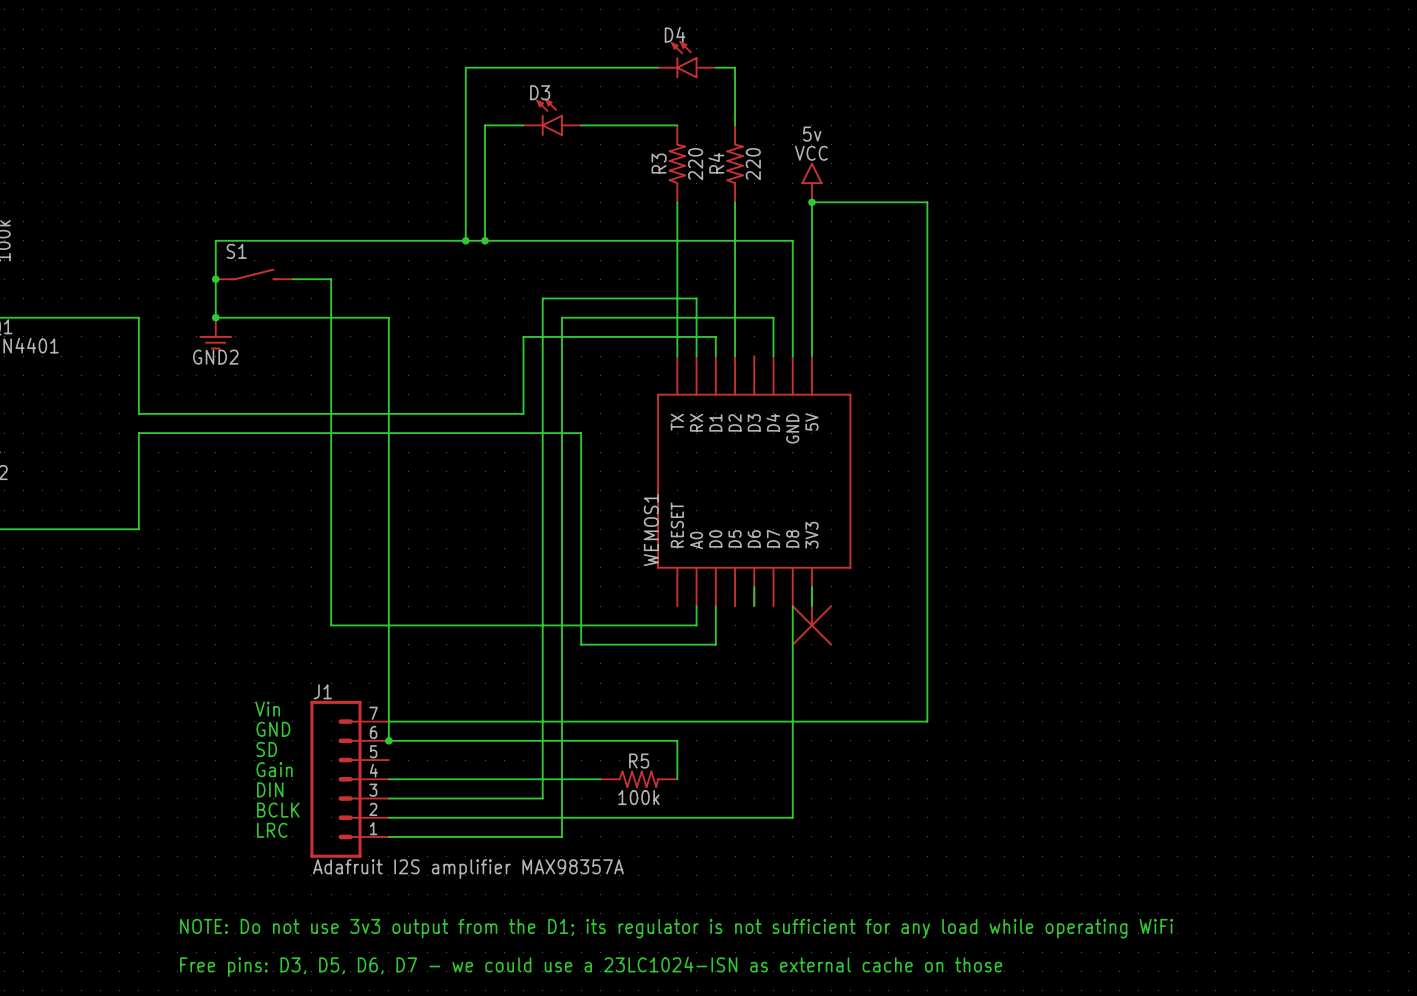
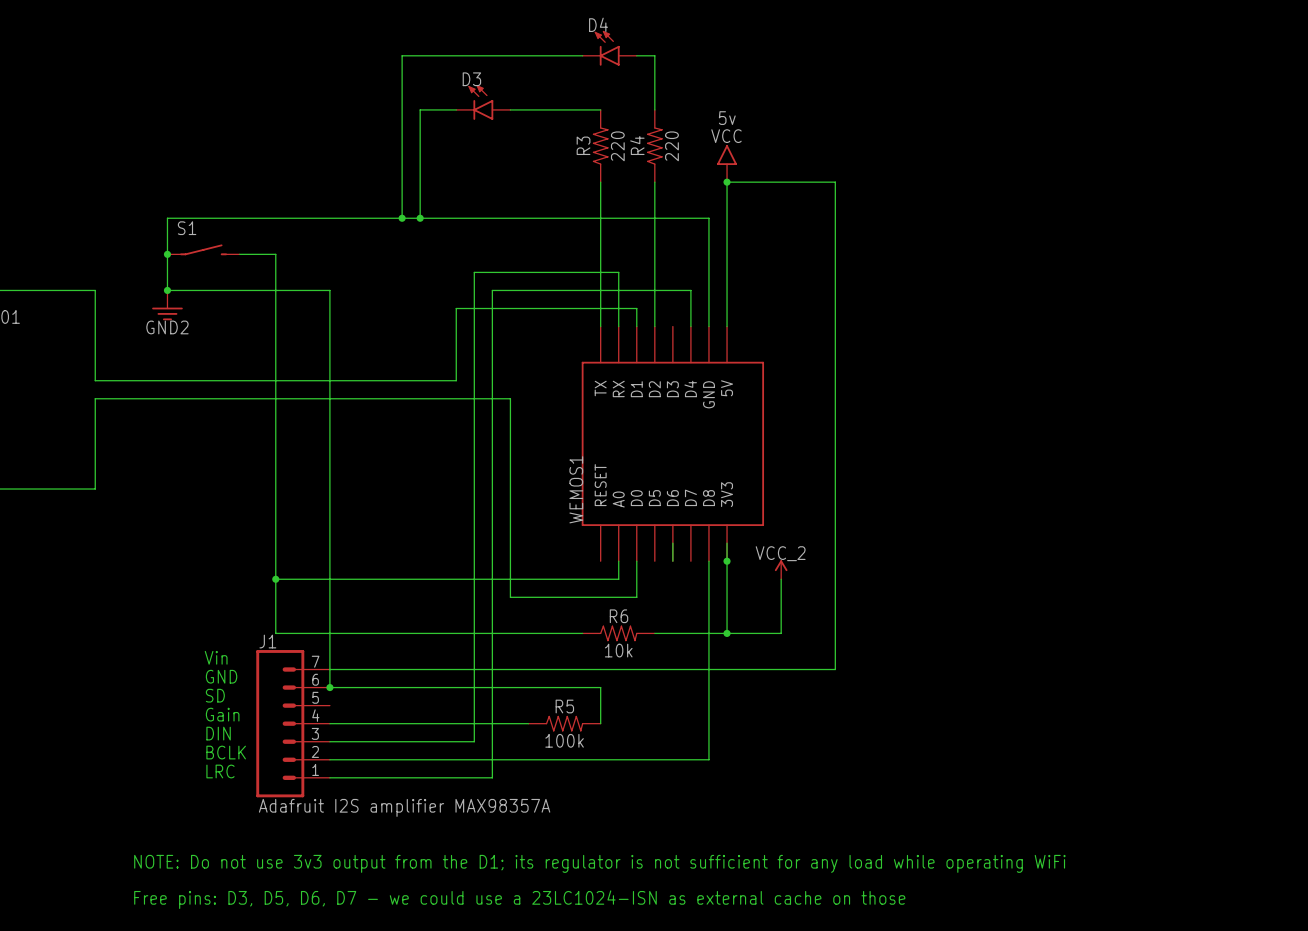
wire: none -> (727, 561) (727, 633)
junction: none -> (727, 561)
power symbol: none -> VCC_2 (781, 569)
part: (811, 616) -> none
wire: none -> (275, 579) (275, 633) (582, 633)
junction: none -> (275, 579)
wire: none -> (781, 579) (781, 633) (654, 633)
R6: none -> 10k (618, 633)
junction: none -> (727, 633)

